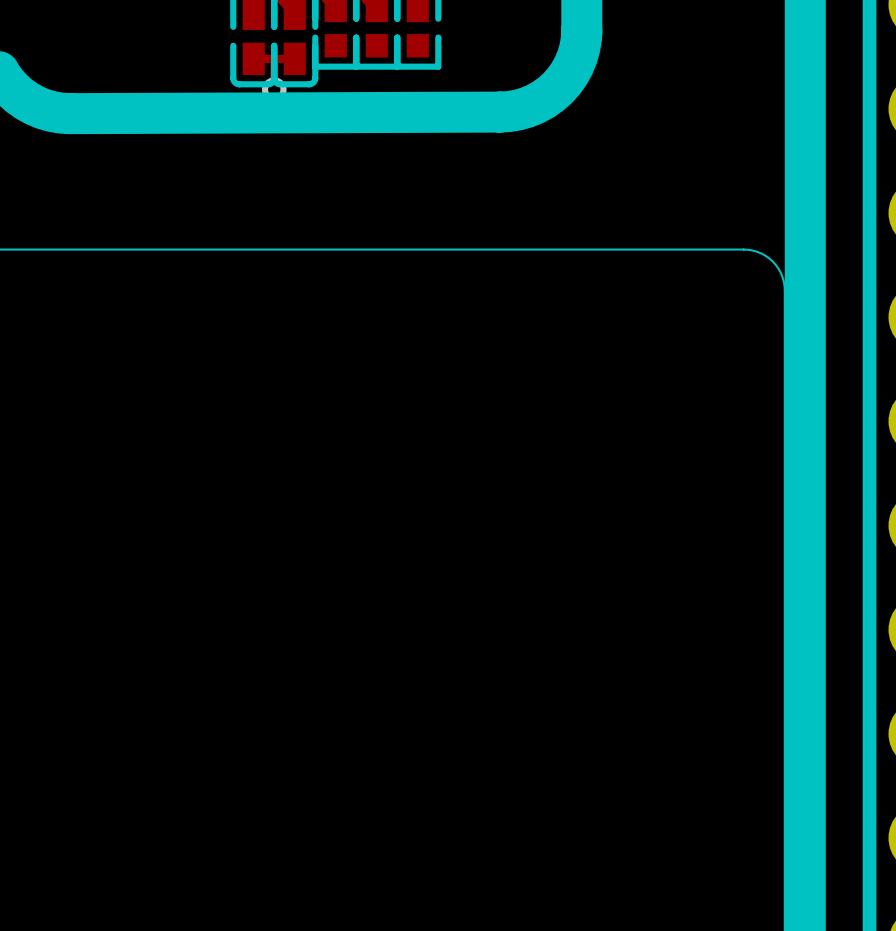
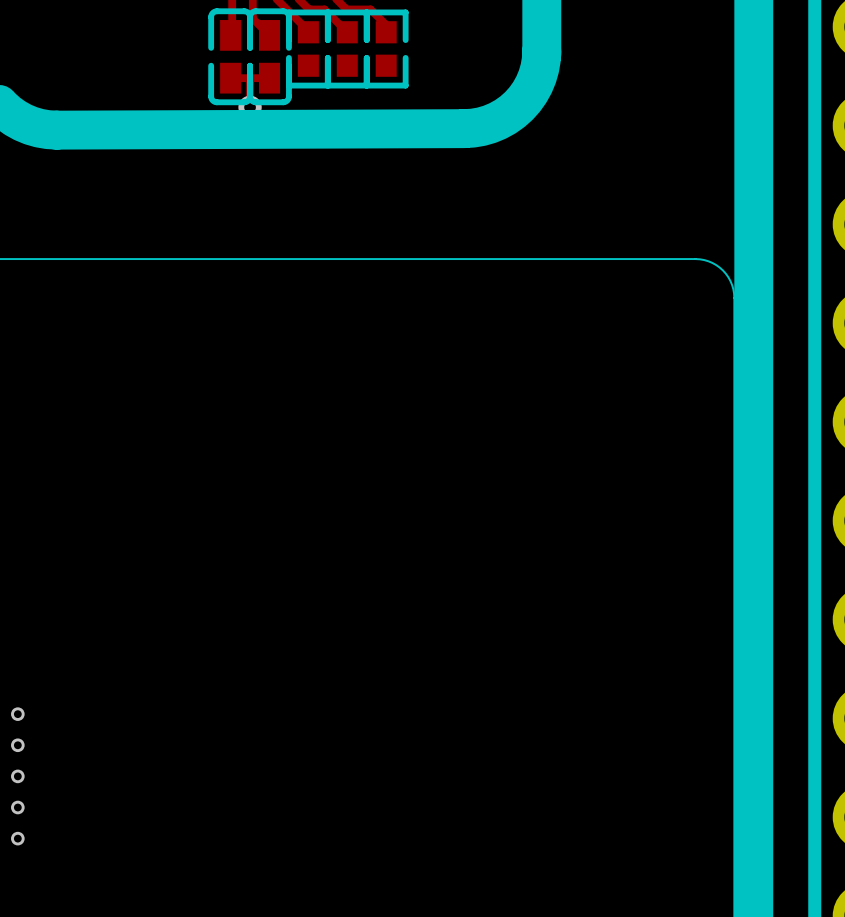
via: none -> (17, 714)
via: none -> (17, 745)
via: none -> (17, 776)
via: none -> (17, 807)
via: none -> (17, 838)

